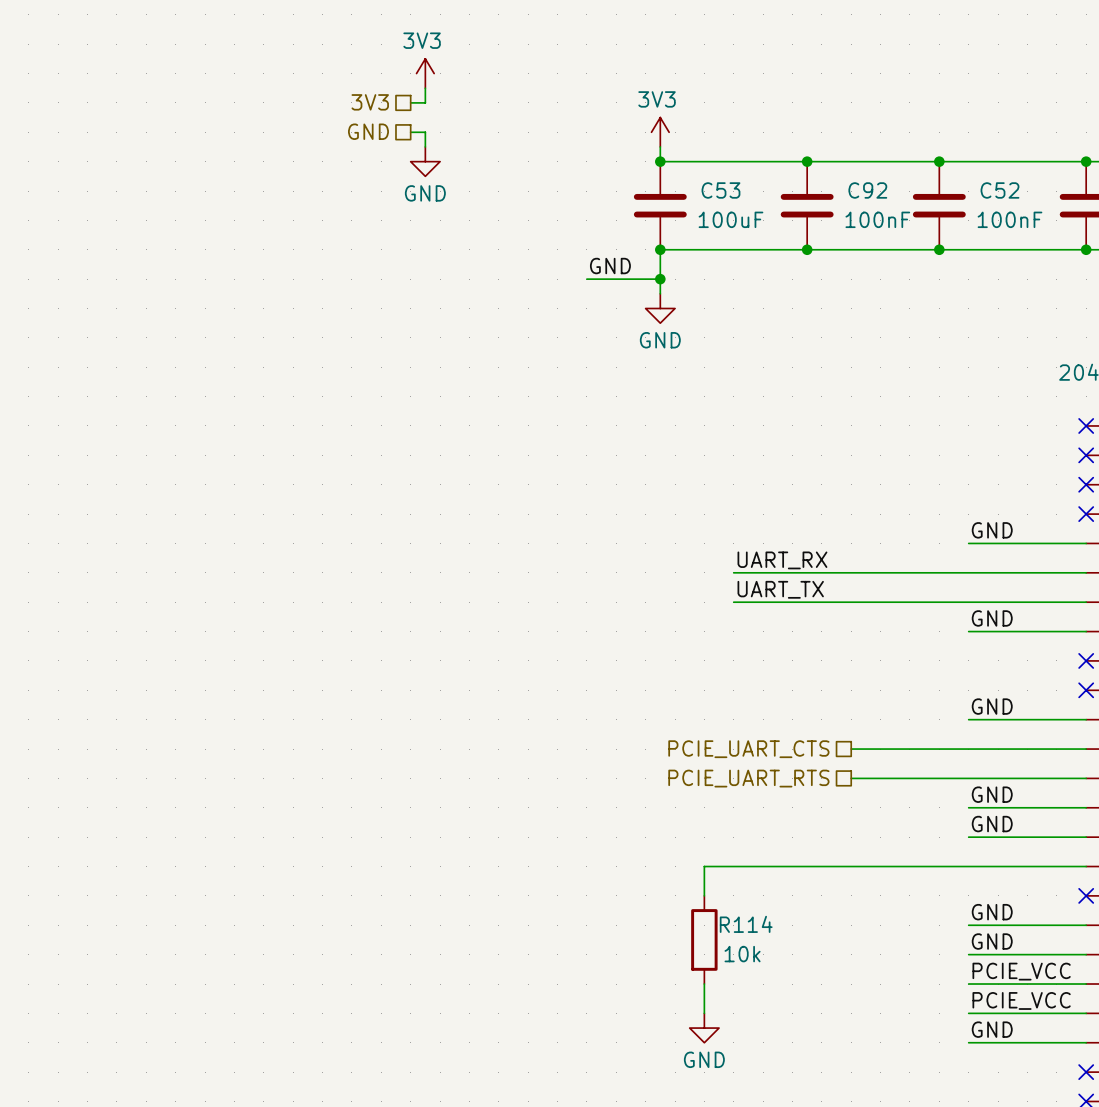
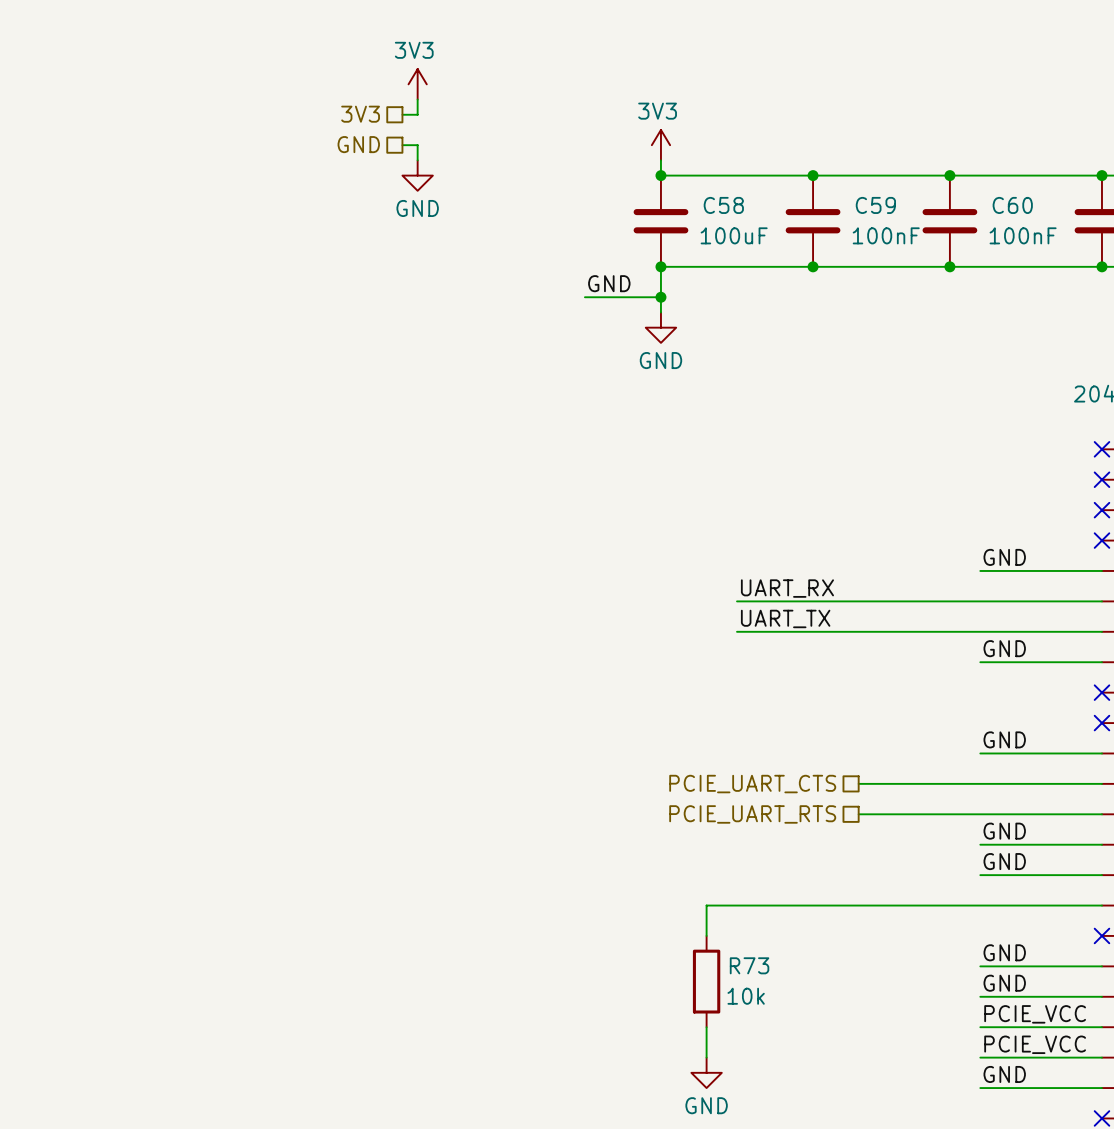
C53 name: C53 (720, 190) -> C58 (723, 205)
C92 name: C92 (867, 190) -> C59 (875, 205)
C52 name: C52 (999, 190) -> C60 (1012, 205)
R114 name: R114 (746, 924) -> R73 (749, 965)

